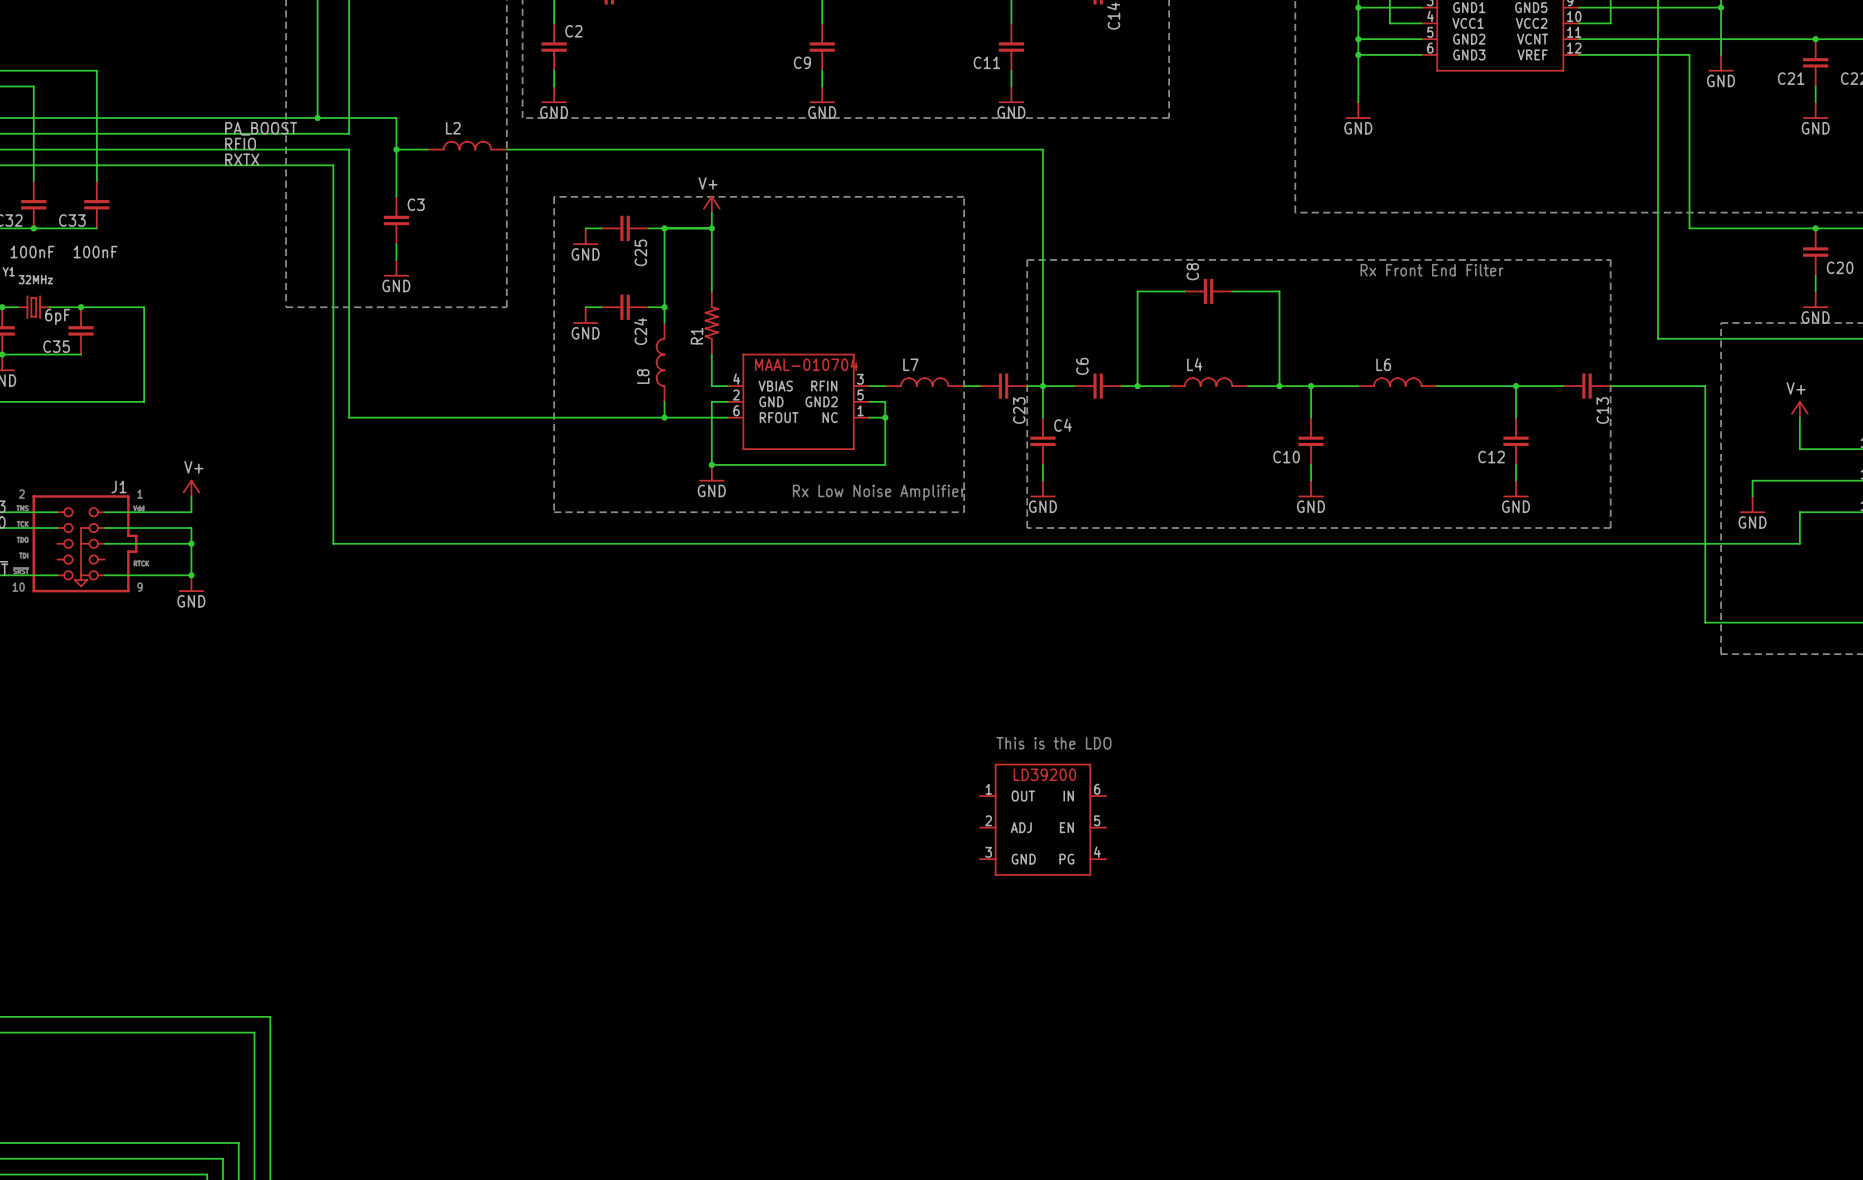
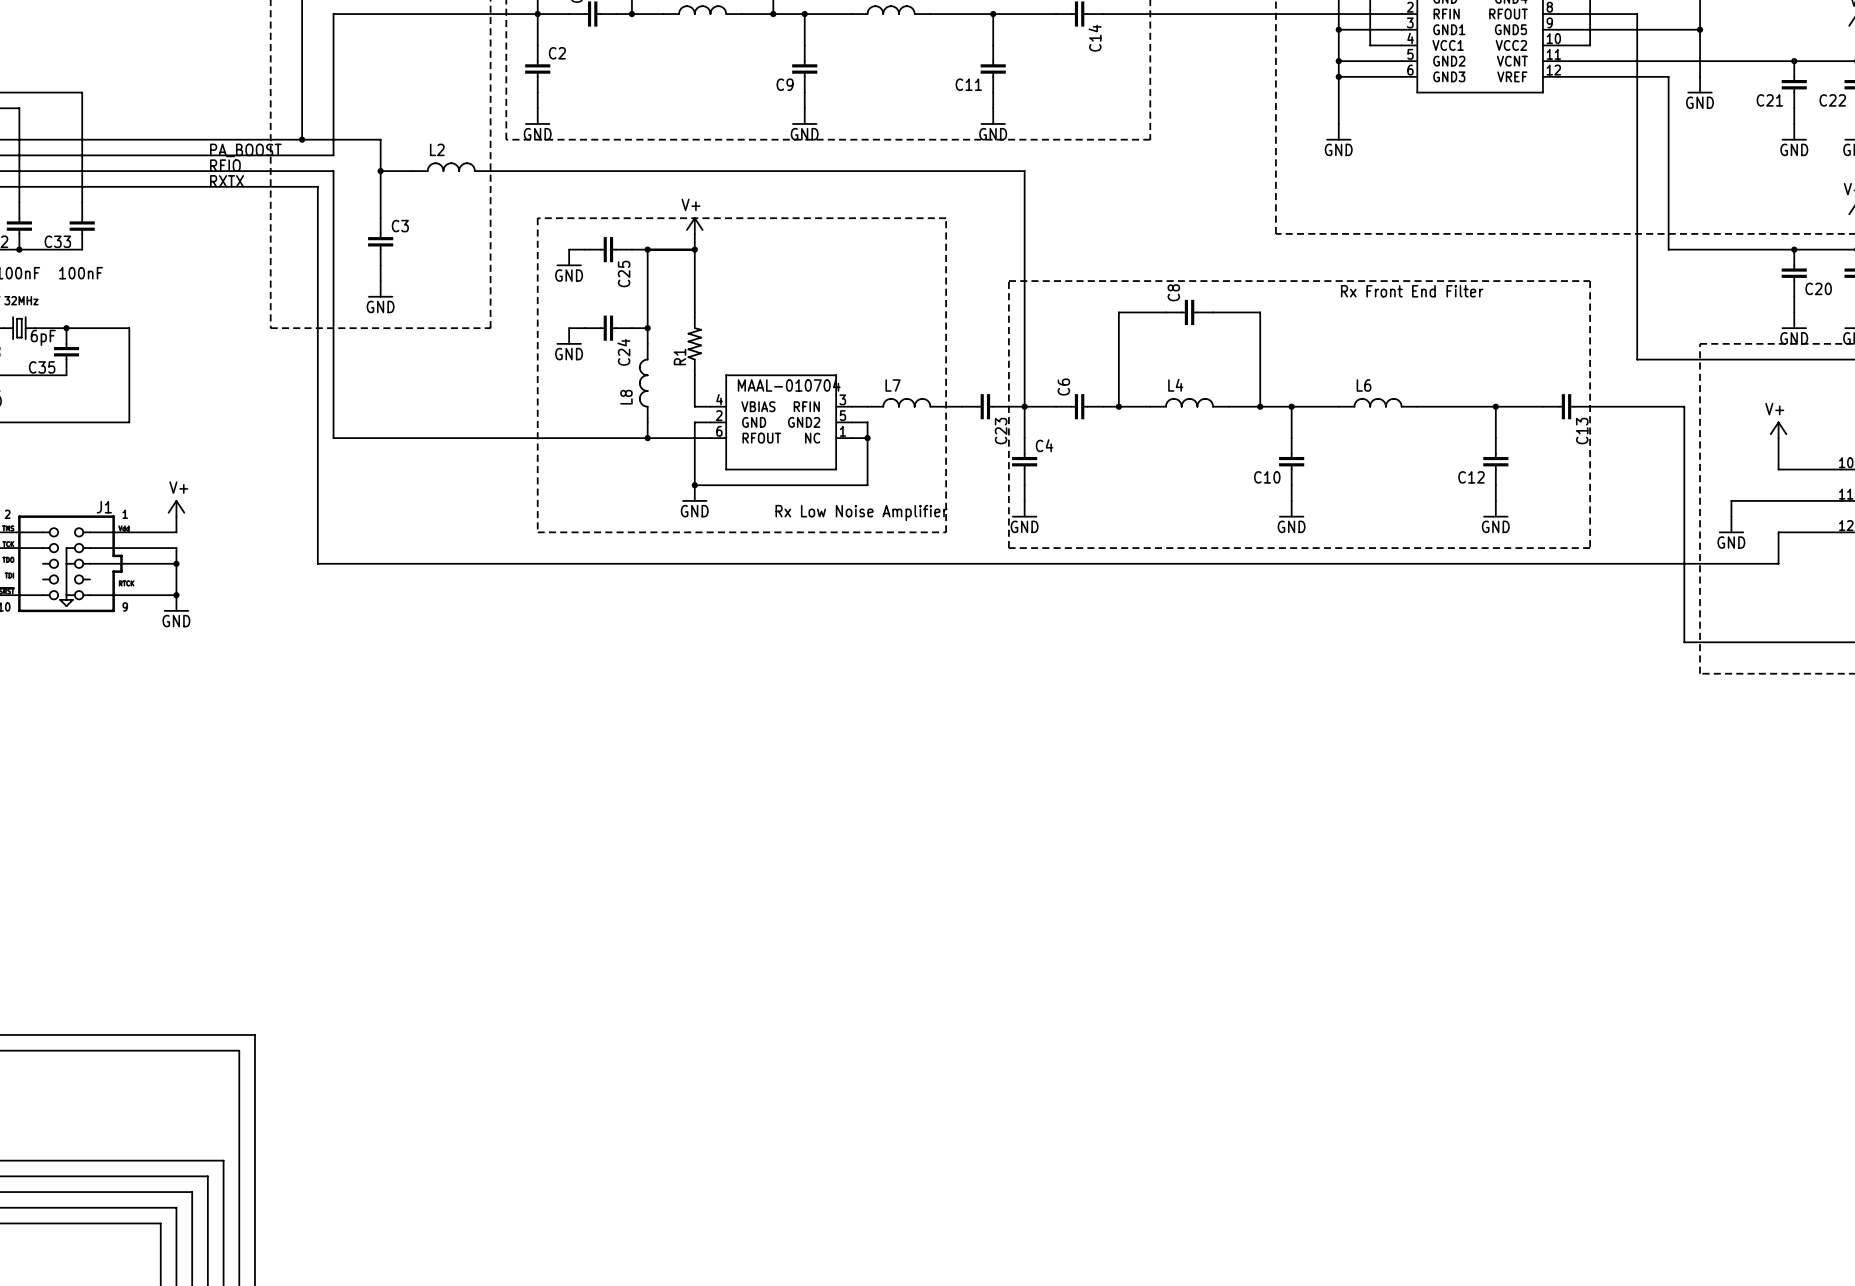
text: This is the LDO (1053, 743) -> none
part: (1042, 819) -> none

